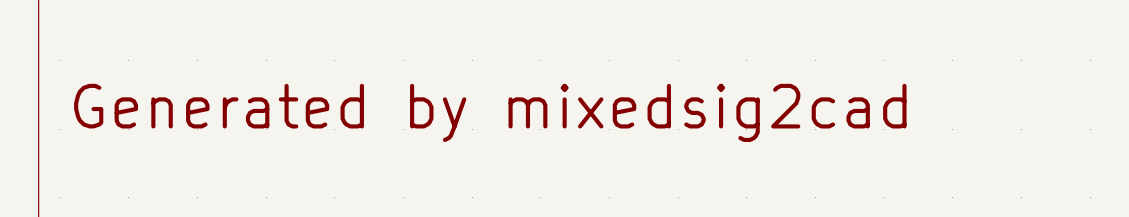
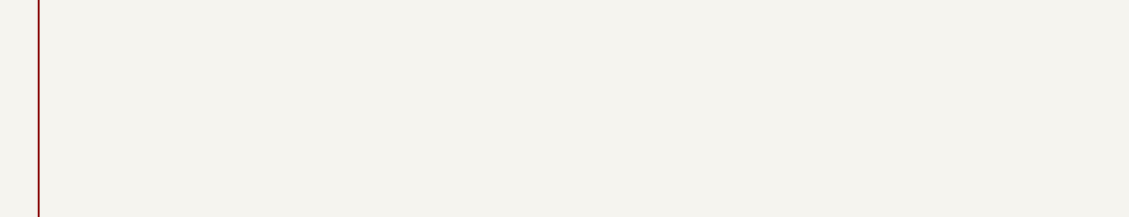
title block: Generated by mixedsig2cad (490, 112) -> none

